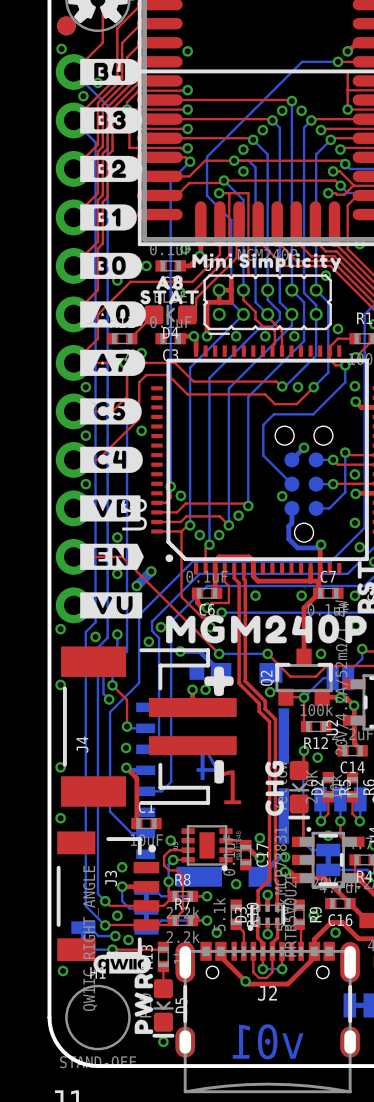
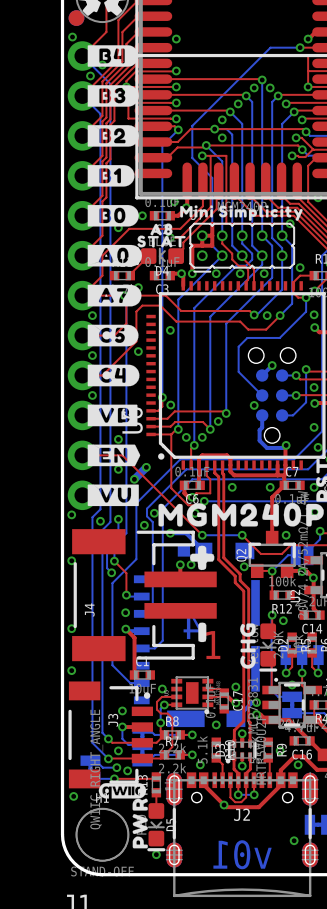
via: none -> (170, 330)
J2 footprint: [175, 941, 360, 1094] -> [166, 772, 319, 898]
via: none -> (294, 840)

